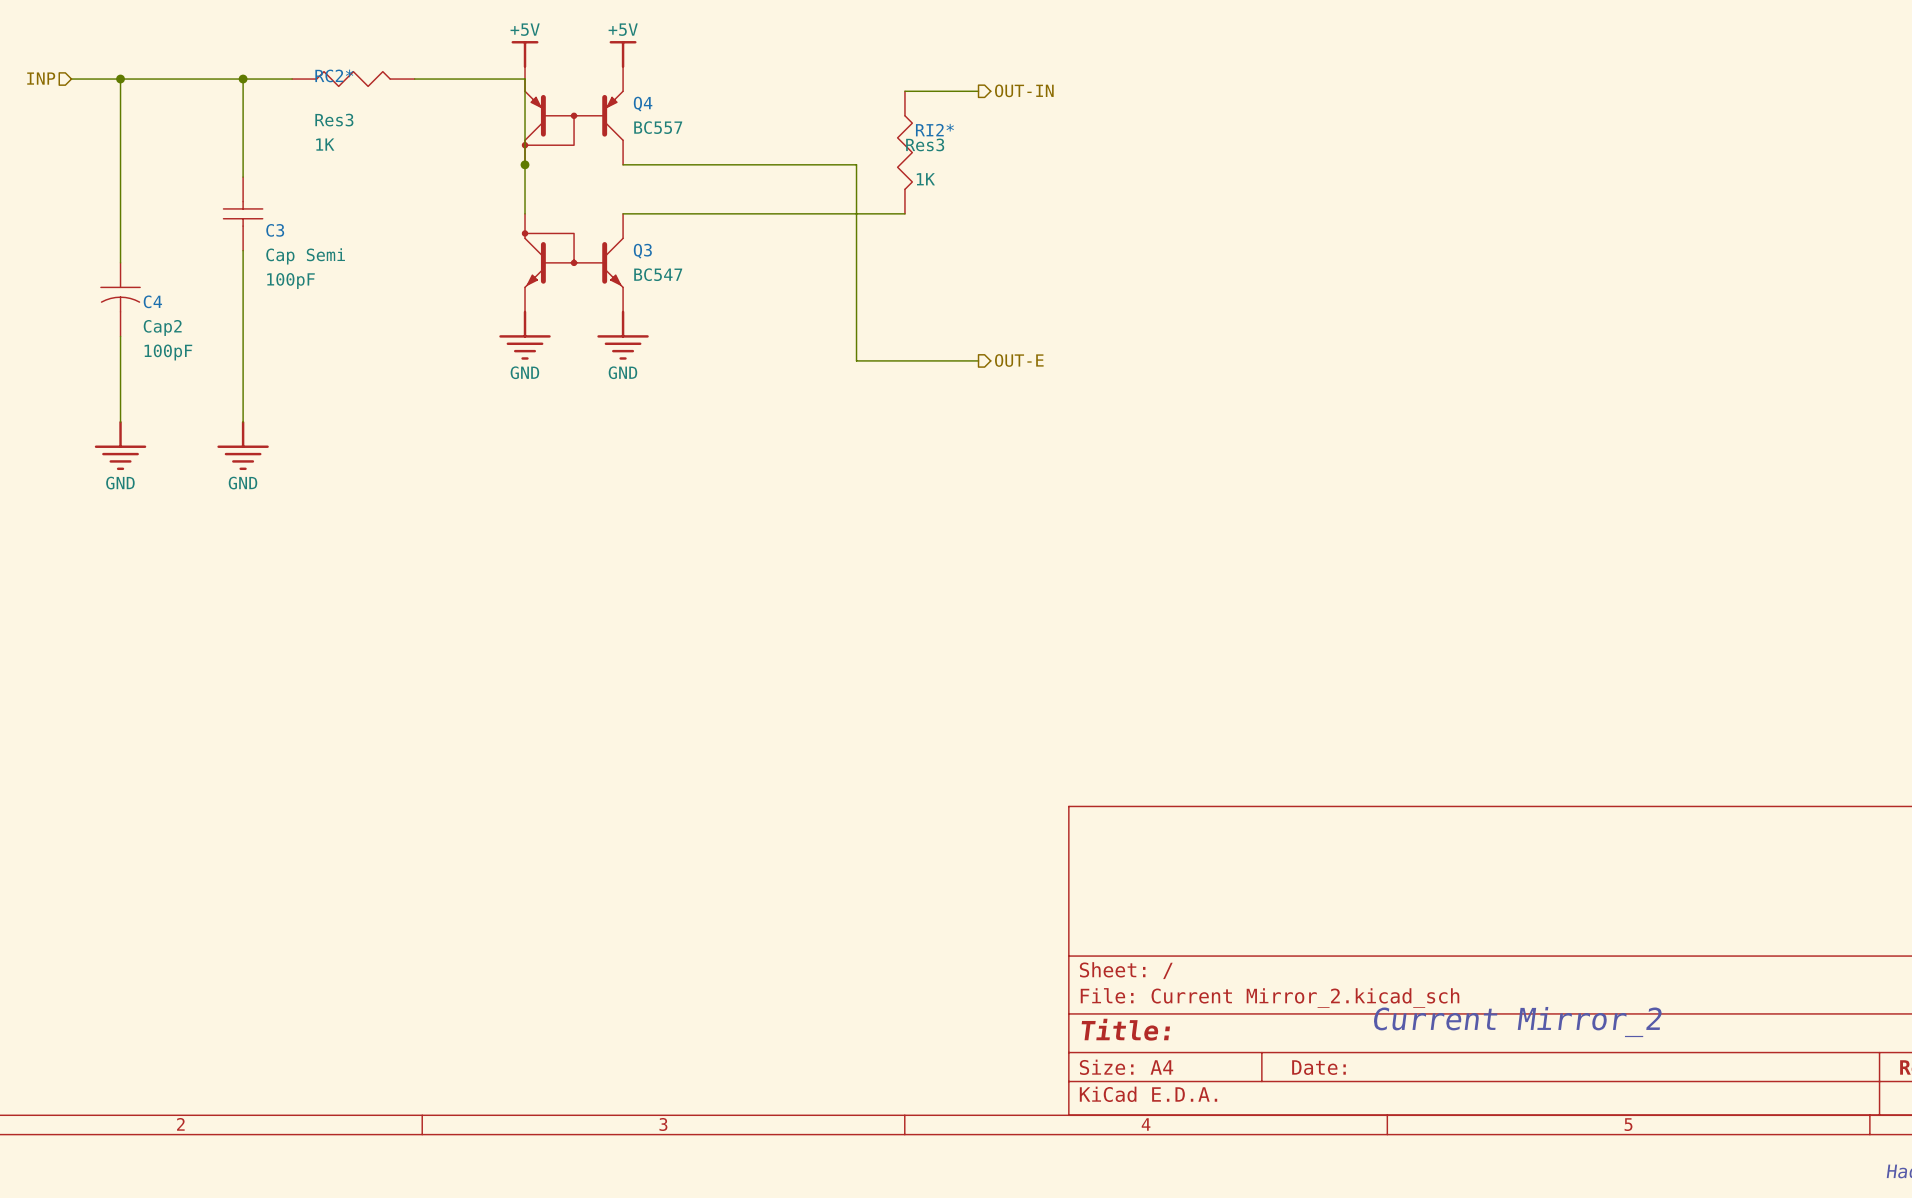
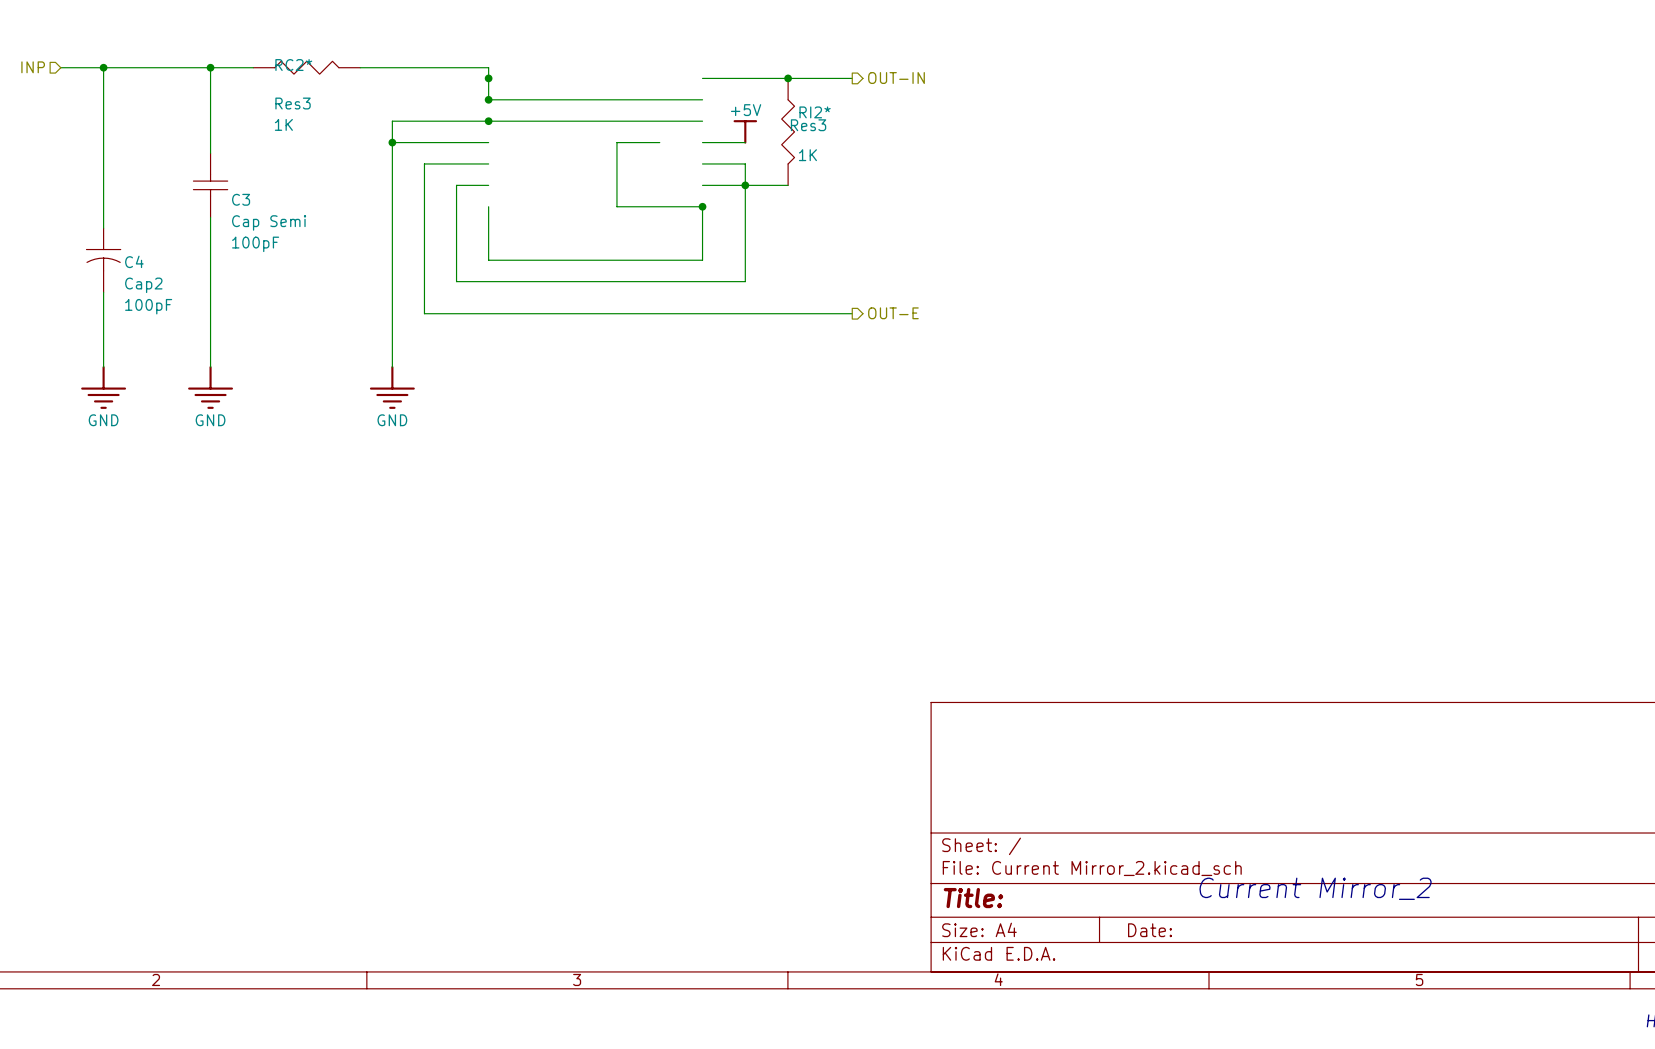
power symbol: +5V (525, 54) -> none
power symbol: +5V (623, 54) -> none
wire: (525, 79) (525, 213) -> (456, 67) (488, 67) (488, 99) (702, 99)
junction: none -> (488, 78)
wire: none -> (702, 78) (788, 78)
junction: none -> (788, 78)
junction: none -> (488, 99)
Q4: BC557 (572, 115) -> none
junction: none -> (488, 121)
wire: none -> (702, 121) (392, 121) (392, 367)
power symbol: none -> +5V (745, 131)
wire: none -> (392, 142) (488, 142)
junction: none -> (392, 142)
junction: (525, 164) -> none
wire: (623, 164) (708, 164) -> (488, 206) (488, 260) (702, 260) (702, 206) (616, 206) (616, 142)
wire: (757, 164) (806, 164) -> none
wire: (855, 164) (856, 360) -> (488, 163) (424, 163) (424, 313) (745, 313)
wire: none -> (702, 163) (745, 163) (745, 281) (456, 281) (456, 185) (488, 185)
wire: (623, 213) (806, 213) -> none
junction: none -> (745, 185)
junction: none -> (702, 206)
Q3: BC547 (572, 262) -> none
power symbol: GND (525, 335) -> none
power symbol: GND (623, 335) -> none
power symbol: none -> GND (392, 387)

